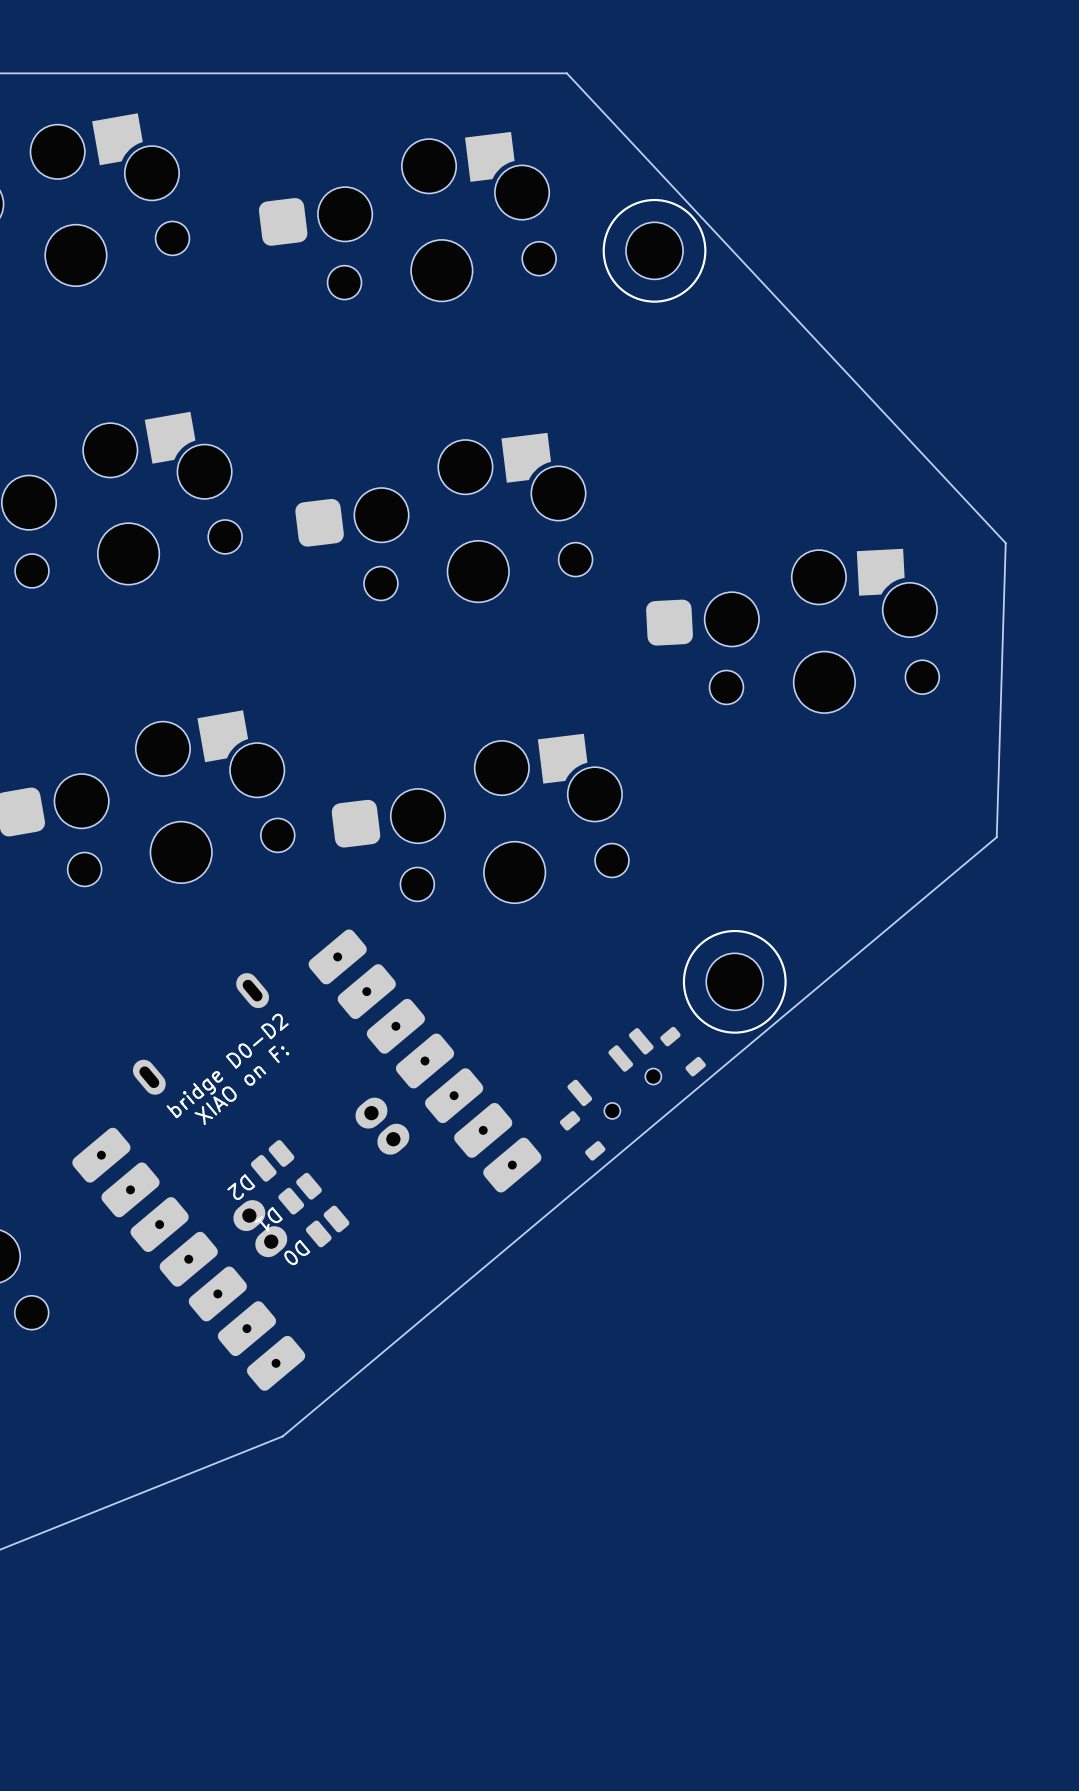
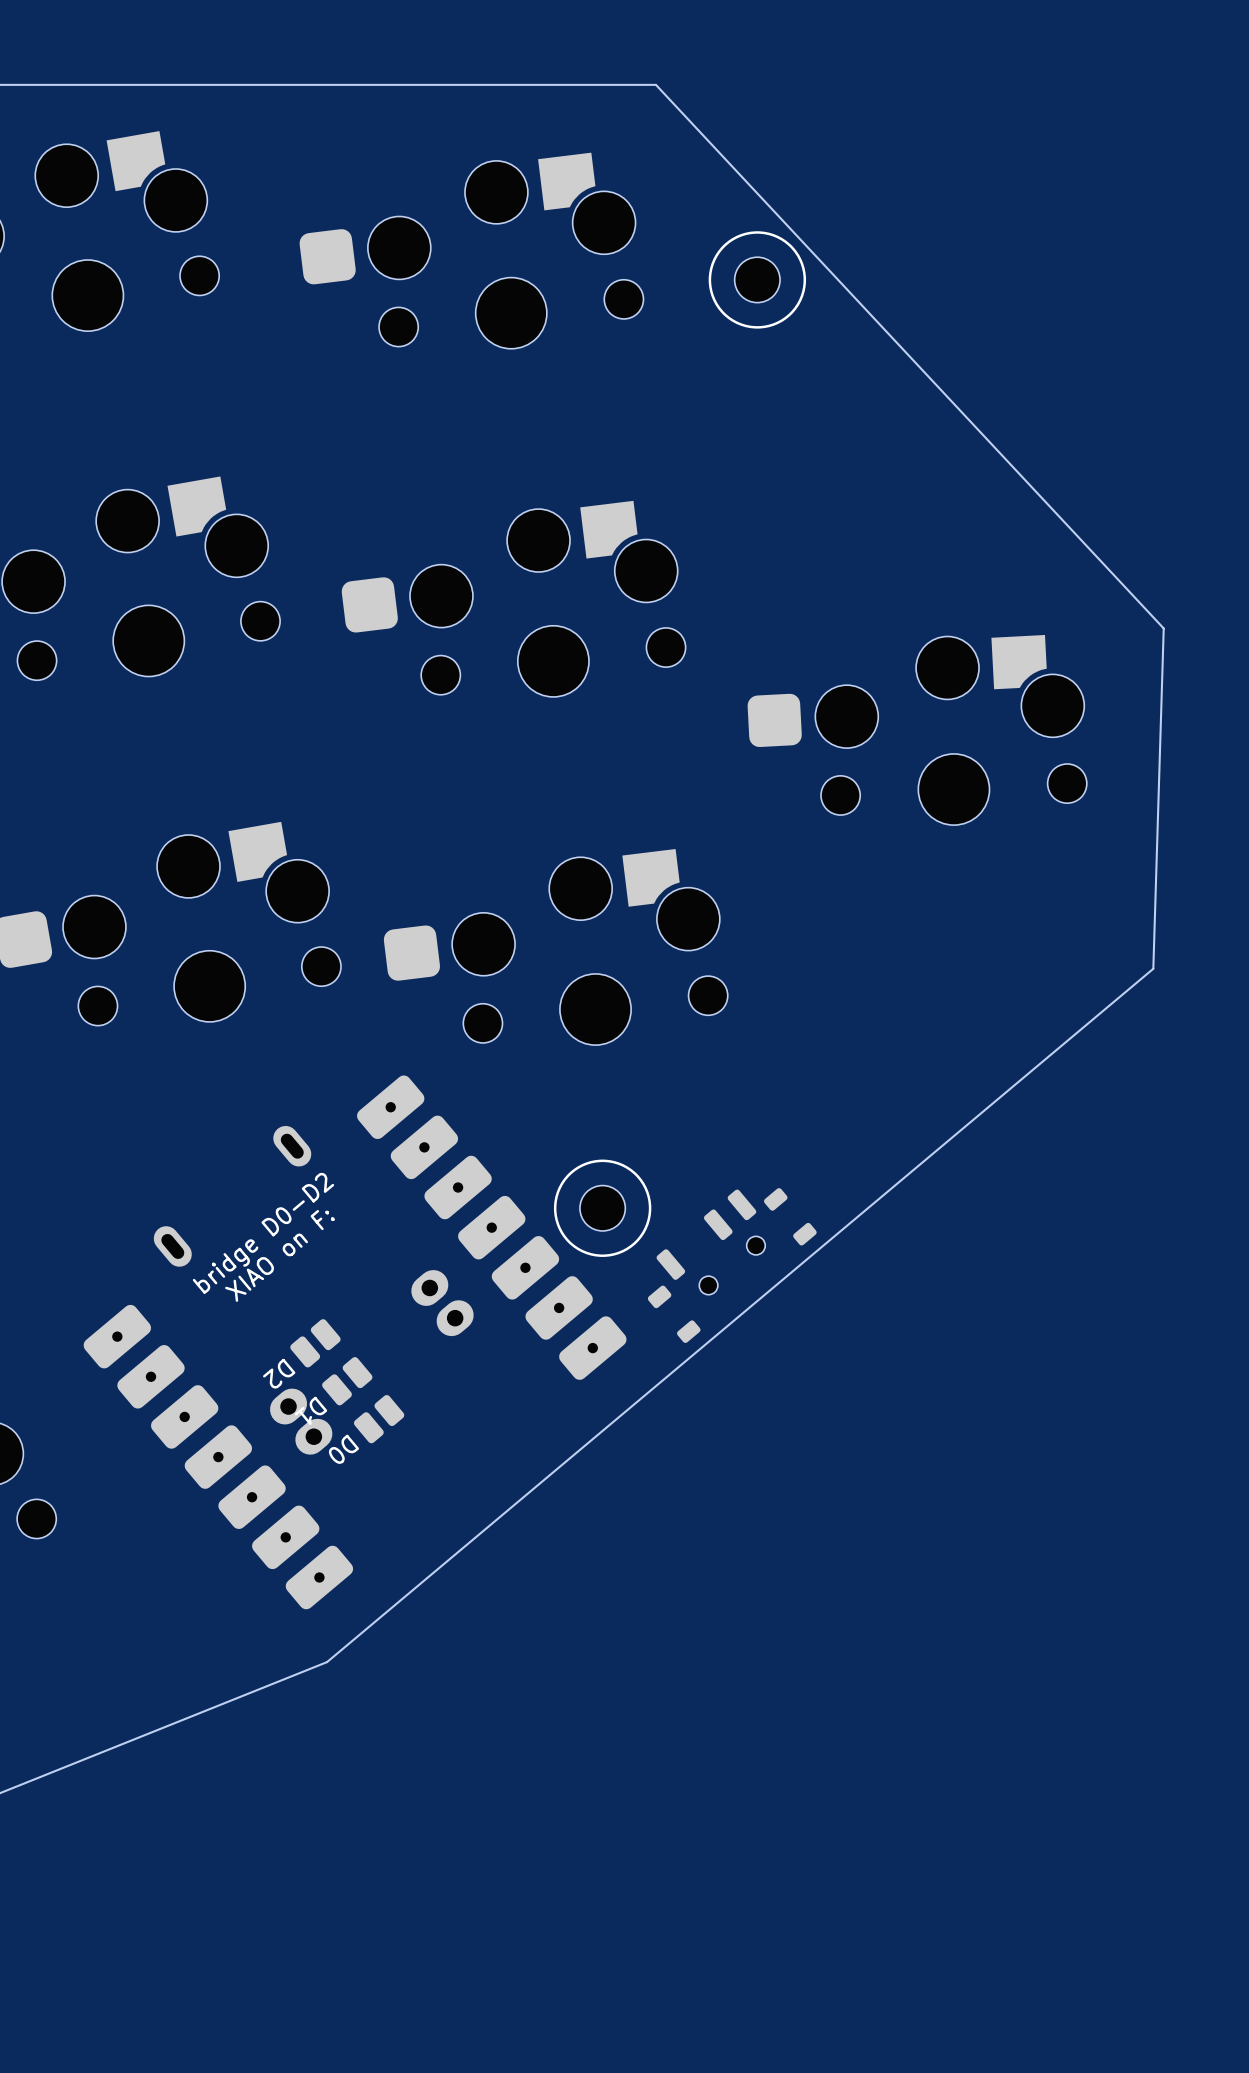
part footprint: [602, 198, 707, 303] -> [708, 231, 807, 329]
part: (734, 981) -> none
part: none -> (602, 1208)

